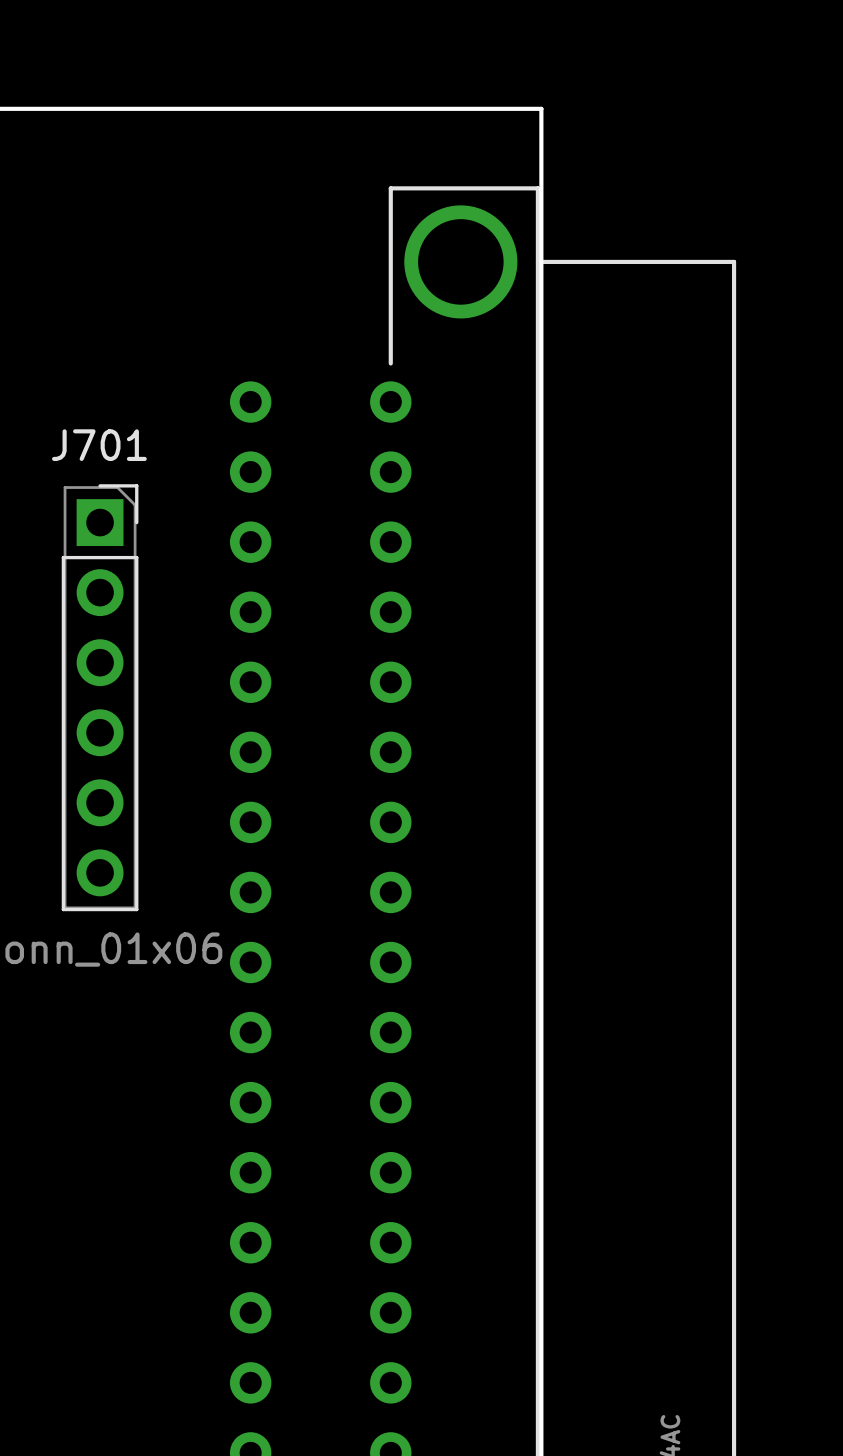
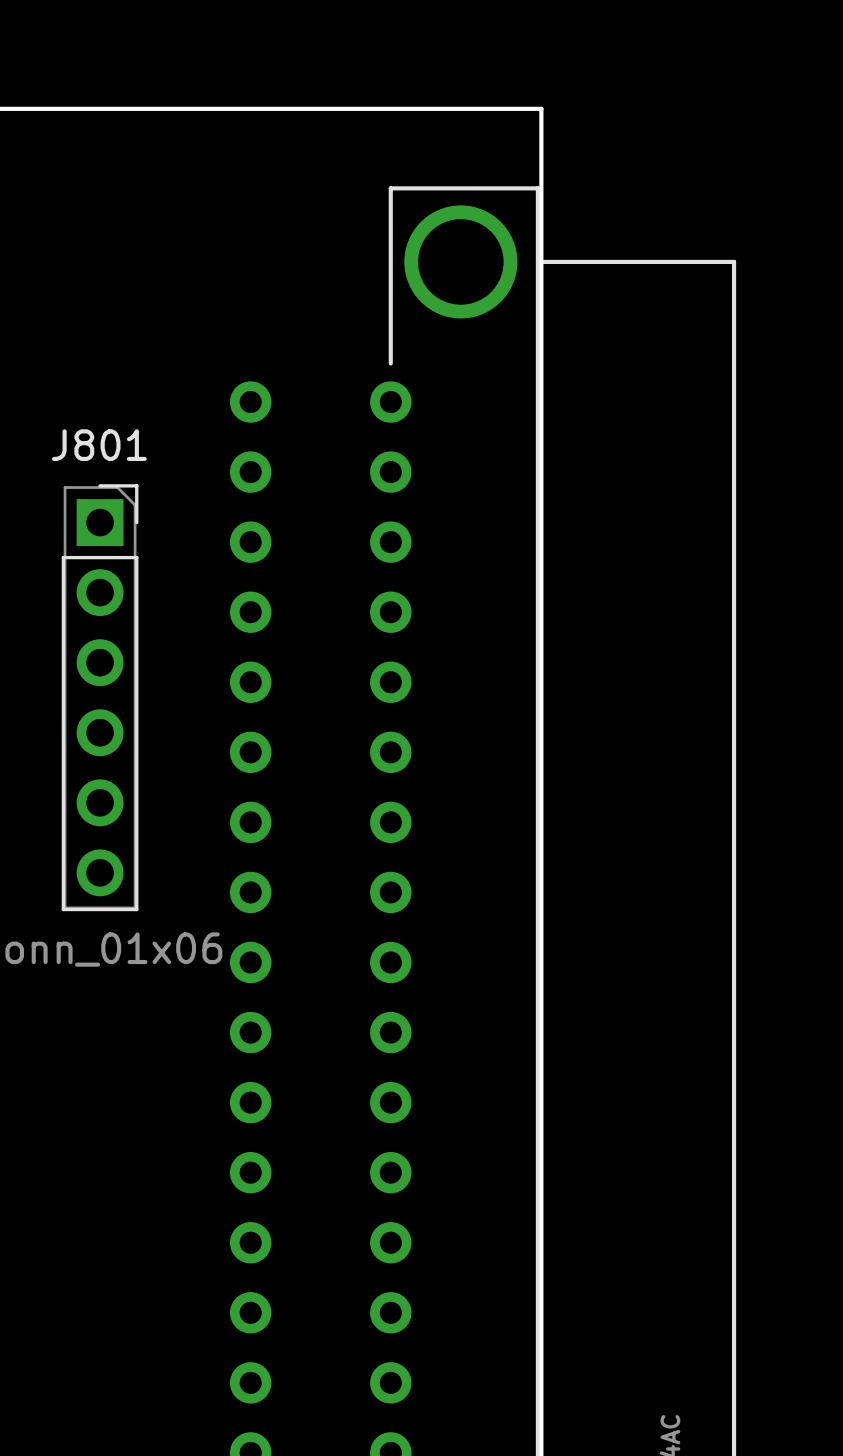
J701 name: J701 (99, 445) -> J801 (99, 445)

